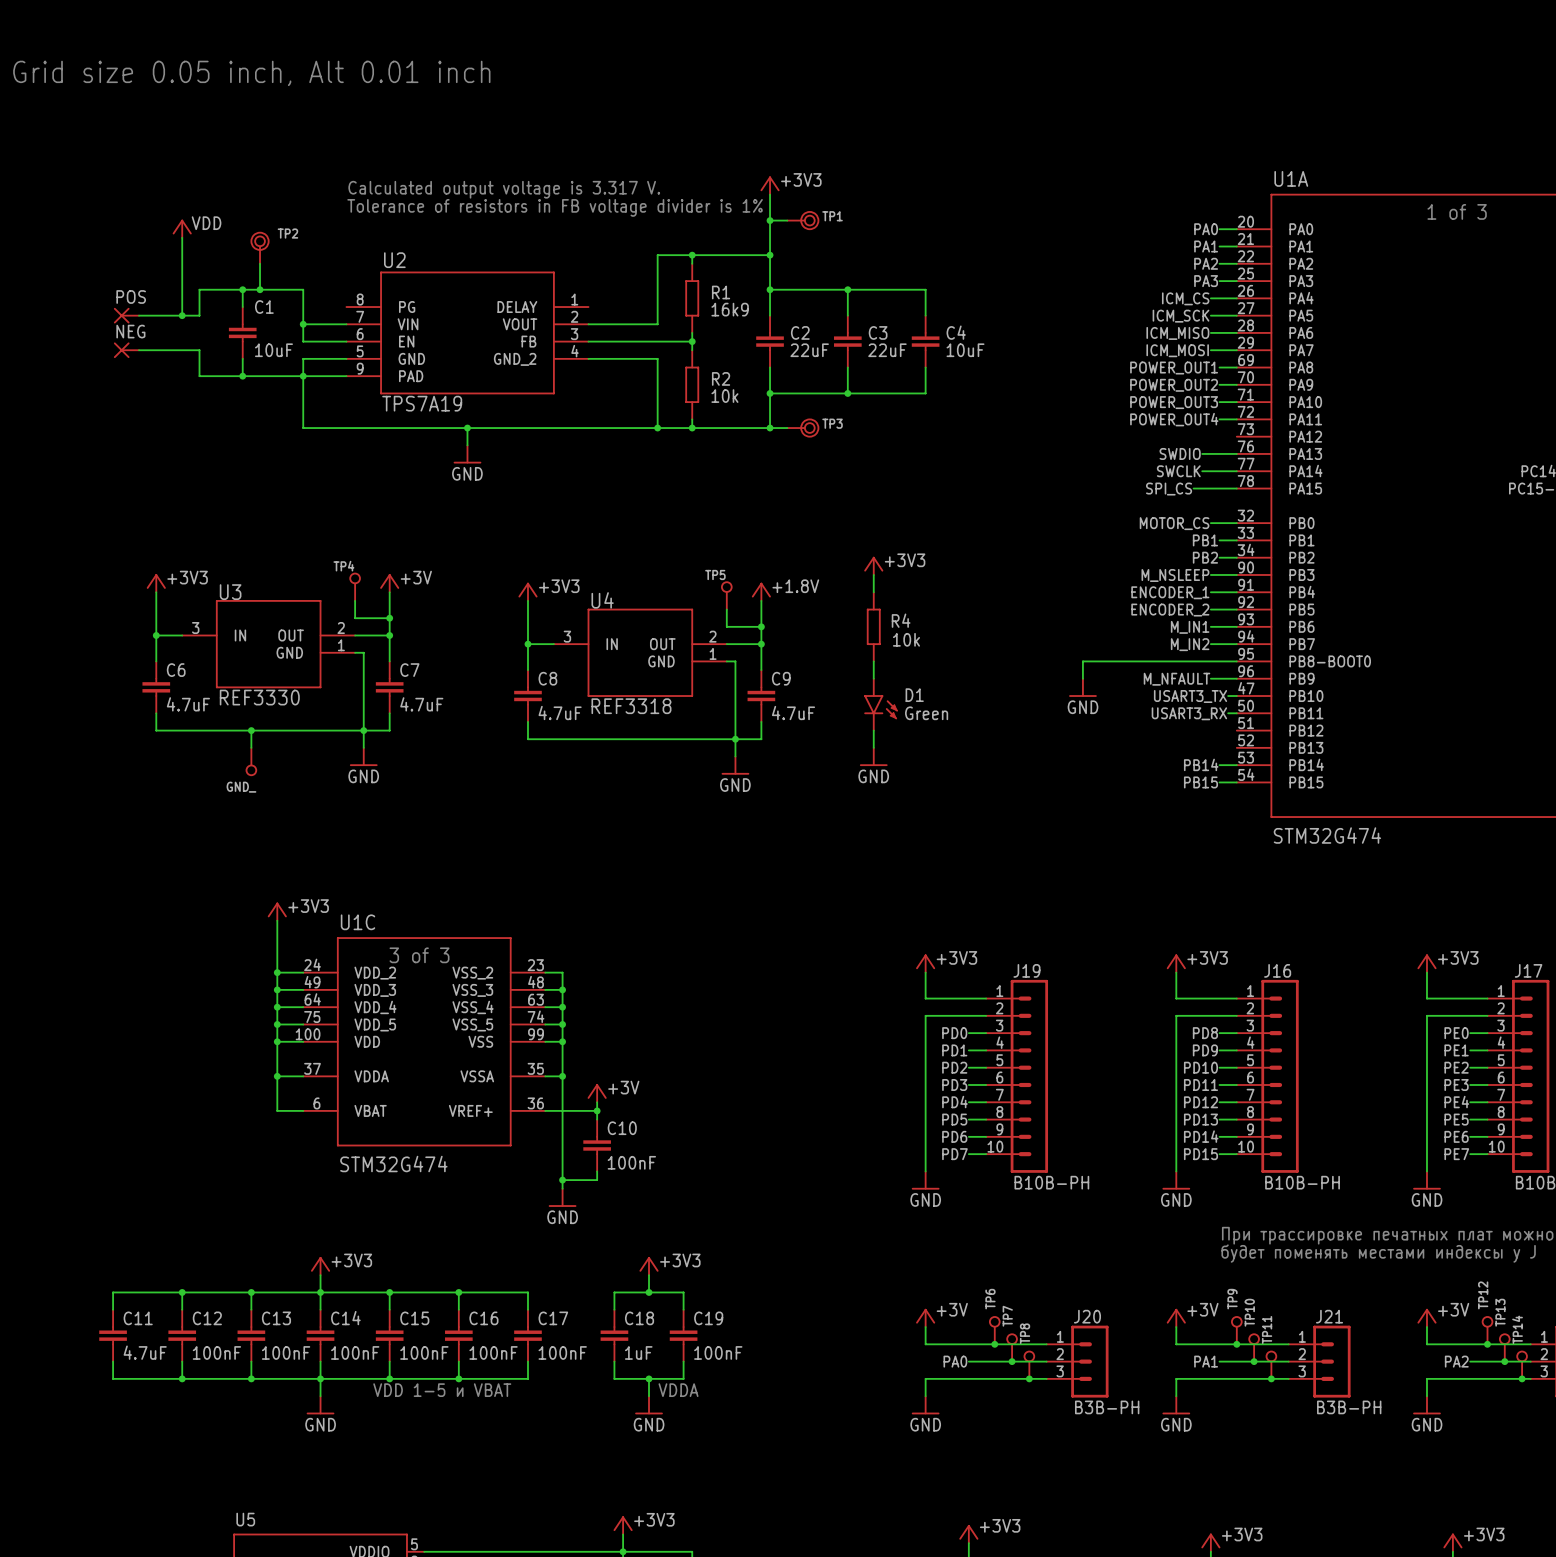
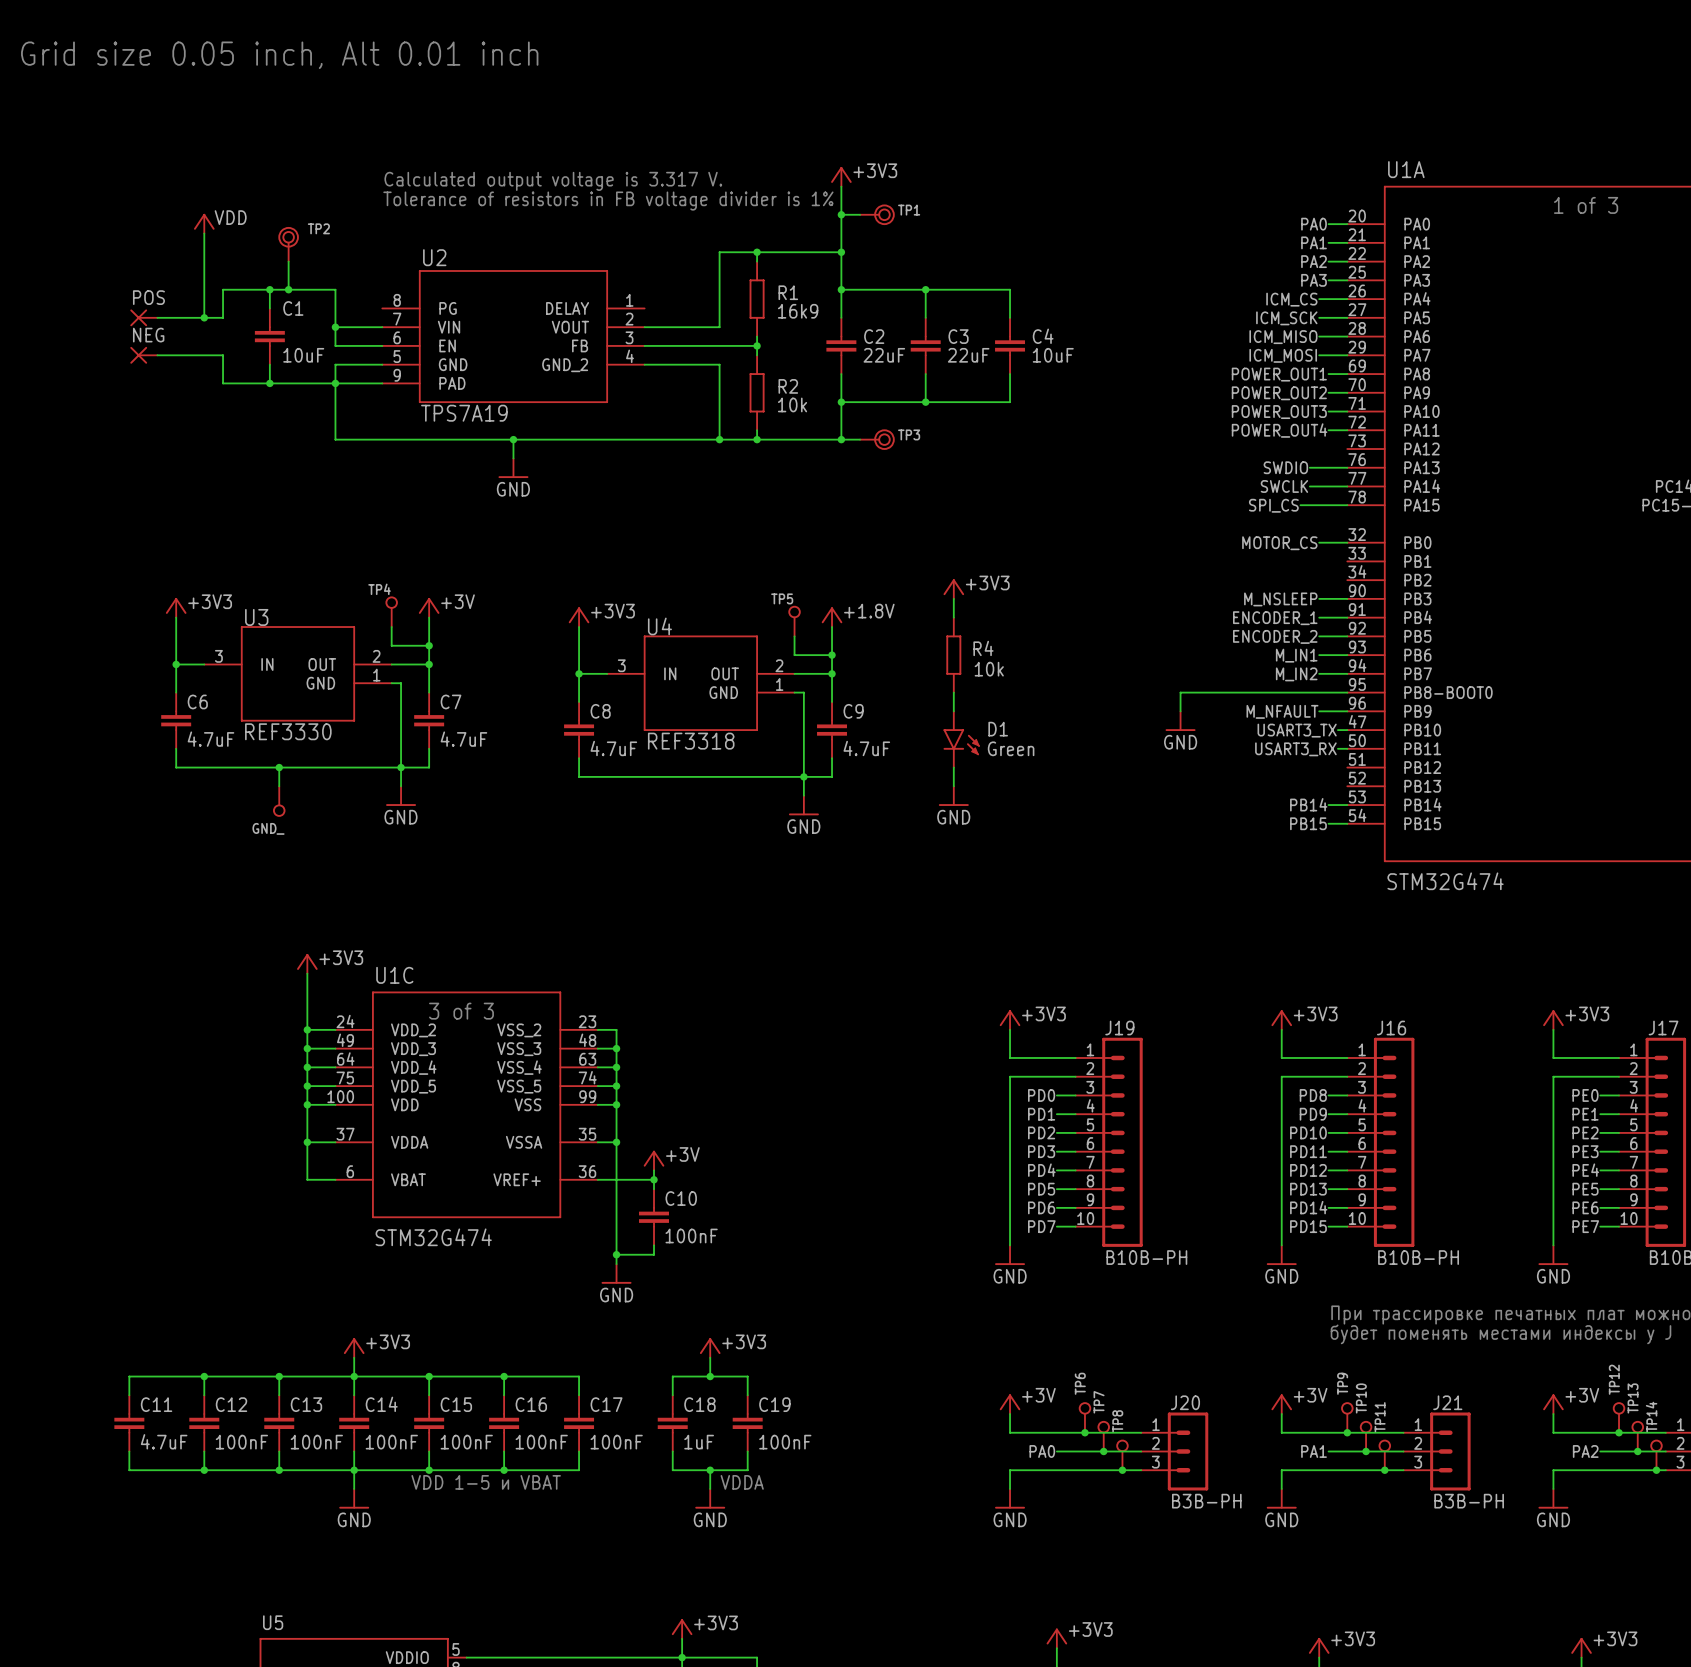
label: PB1 (1205, 540) -> none
wire: (1219, 540) (1236, 540) -> none
label: PB2 (1205, 557) -> none
wire: (1219, 557) (1236, 557) -> none

